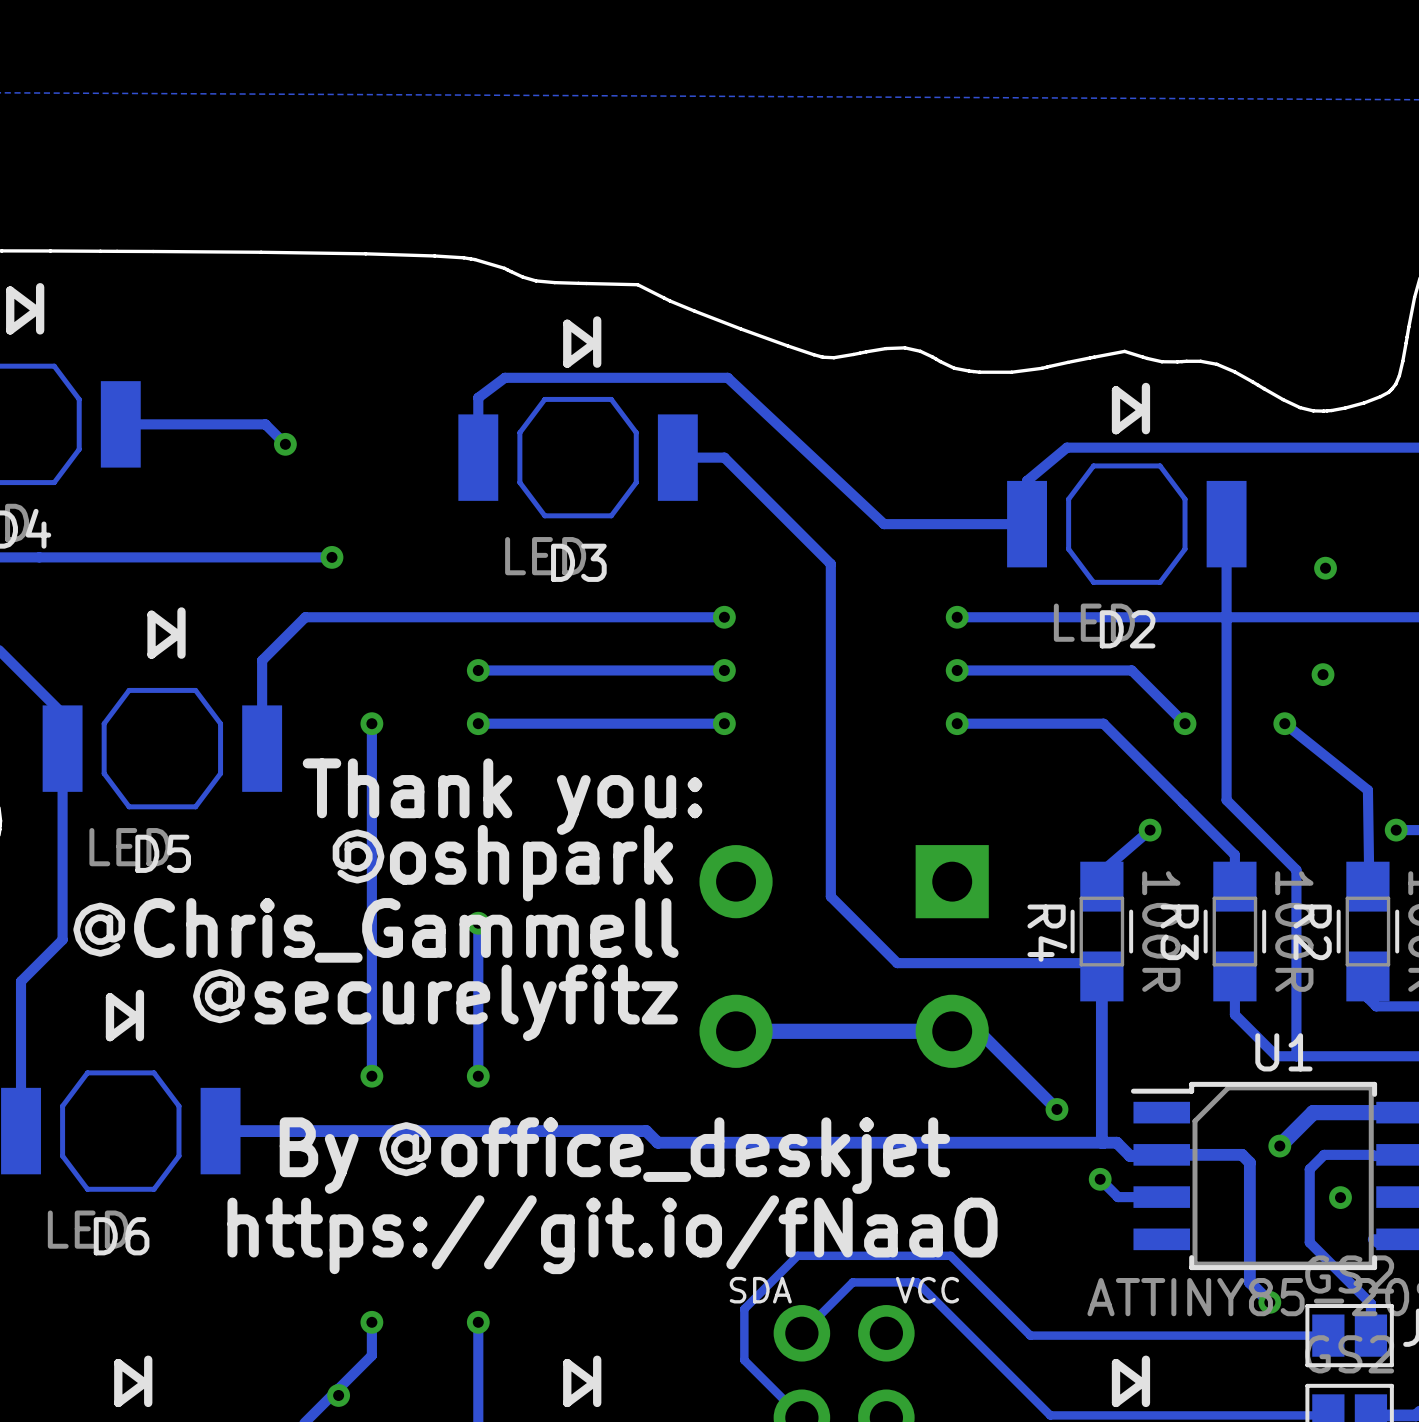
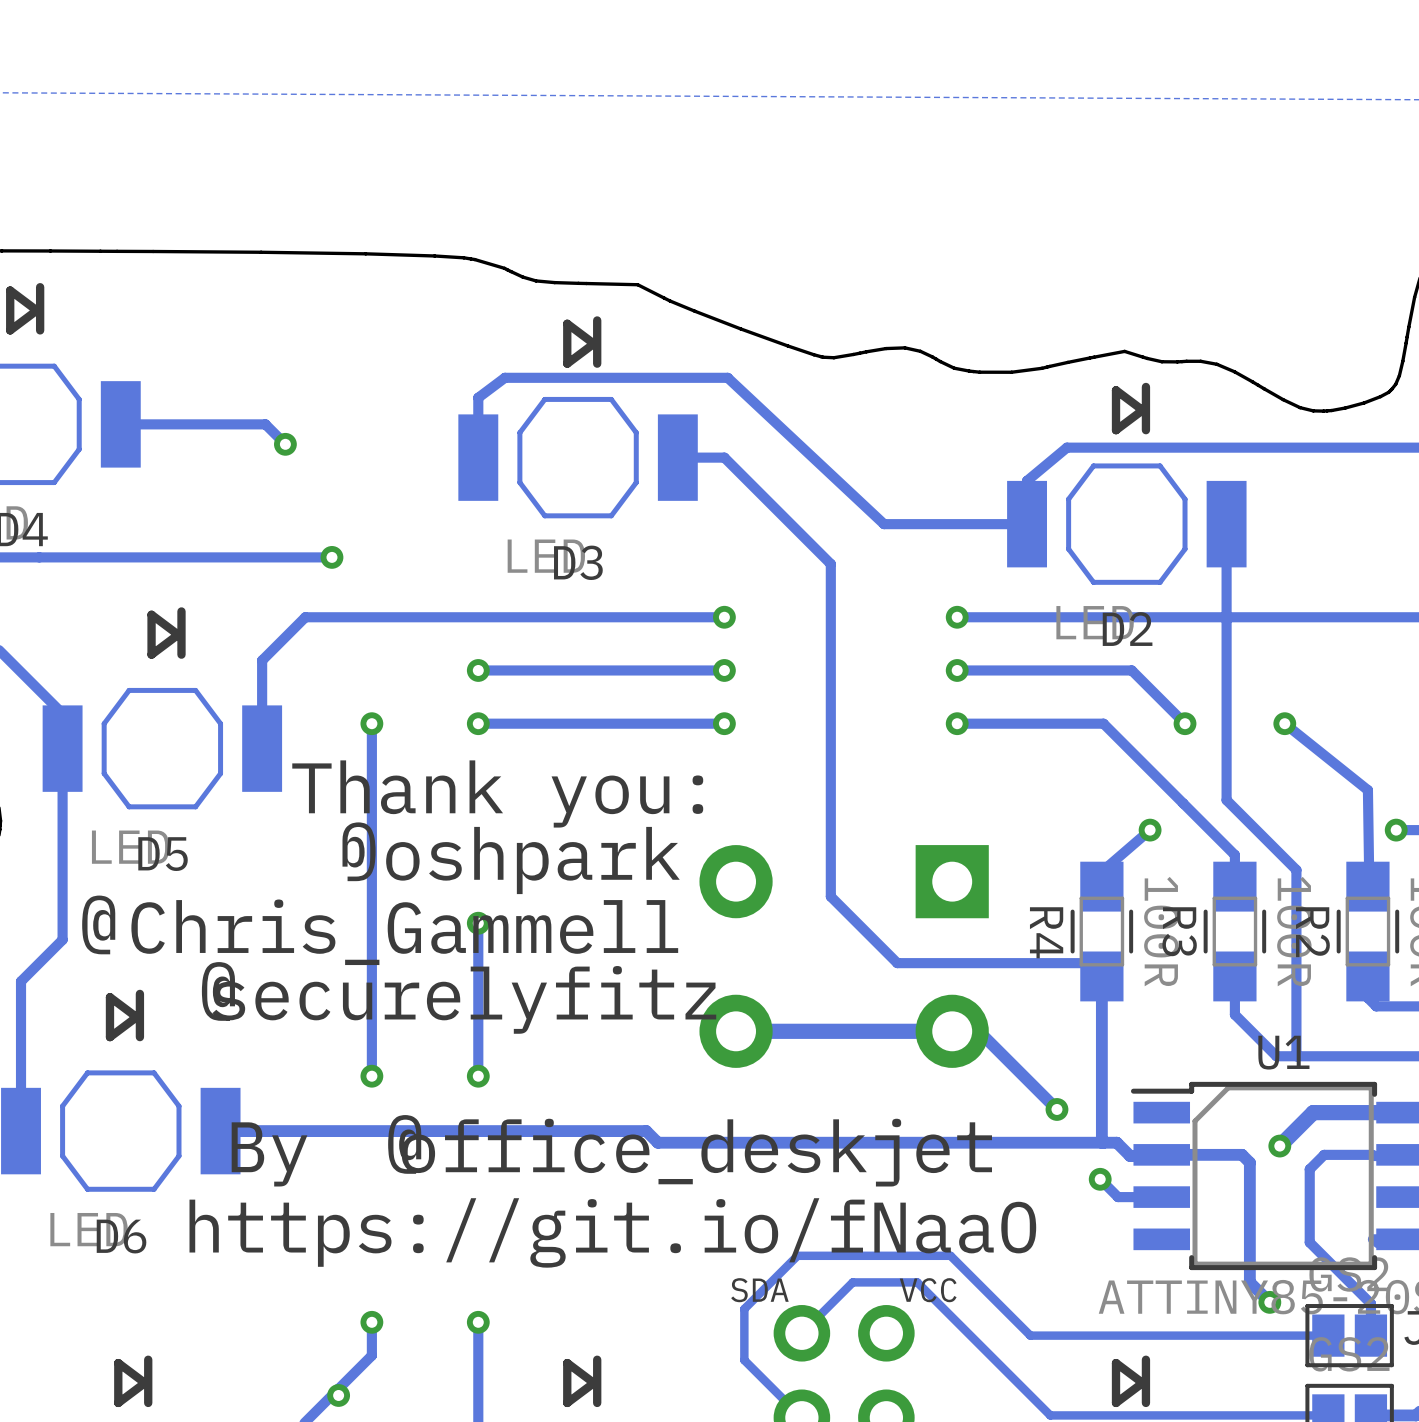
via: (1325, 568) -> none
via: (1323, 674) -> none
via: (1340, 1197) -> none

